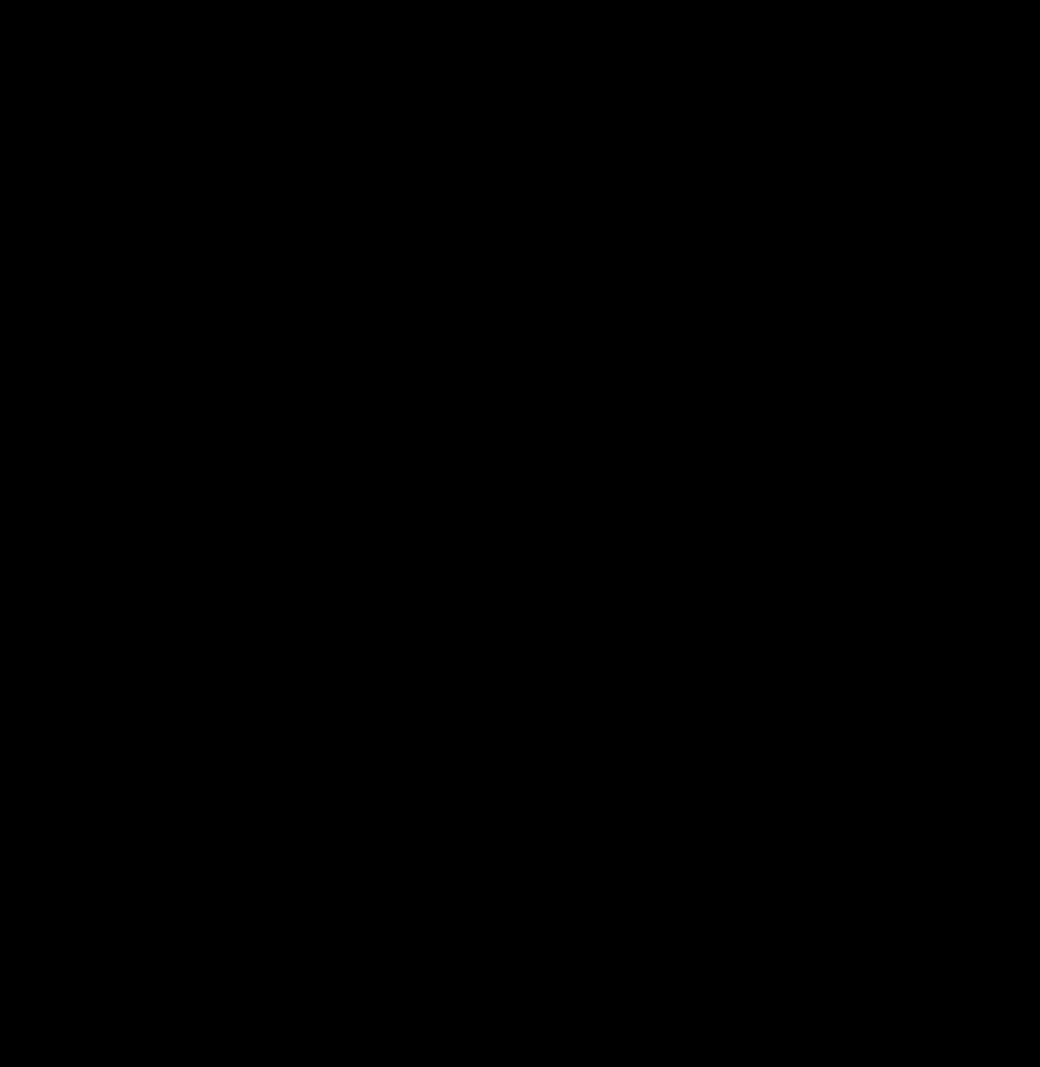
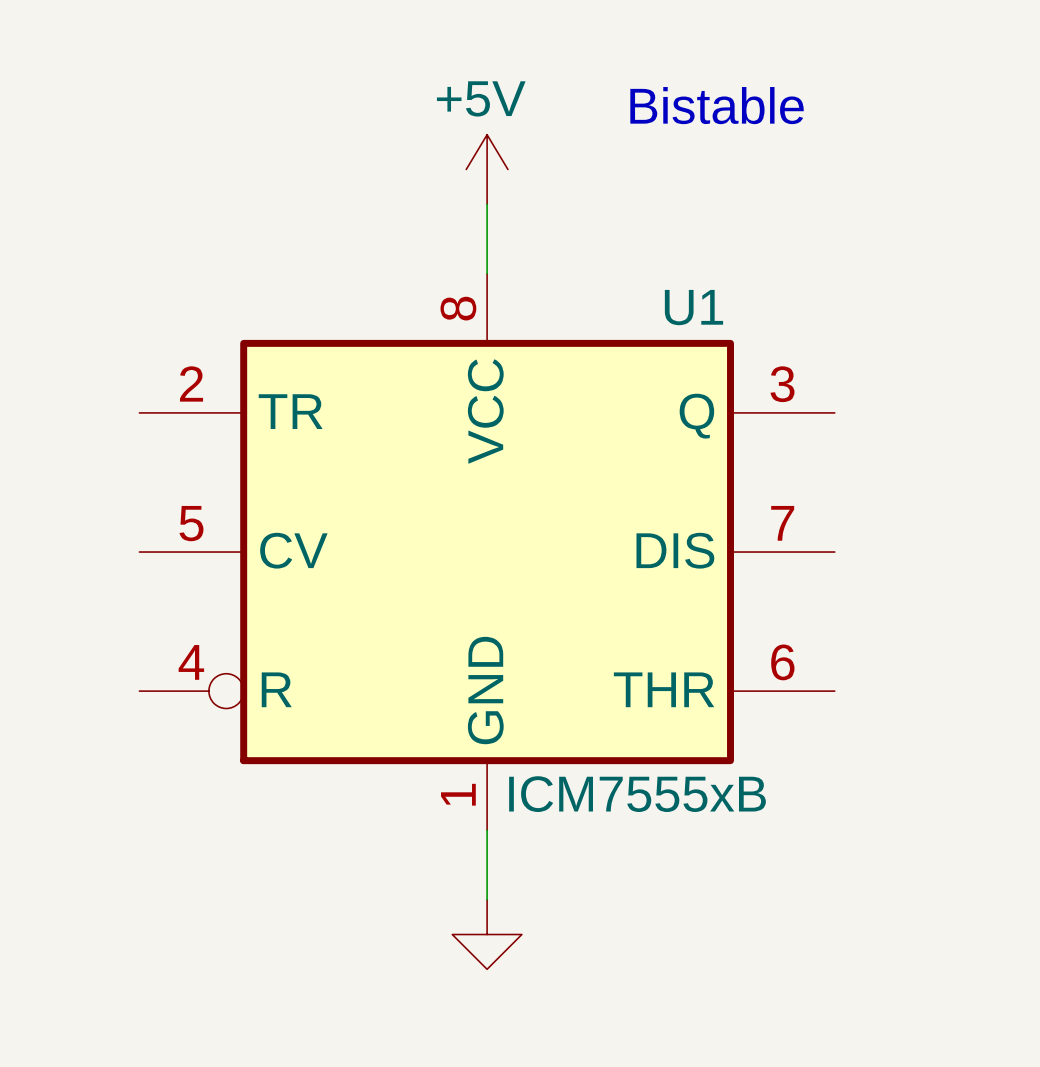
text: none -> Bistable (717, 105)
power symbol: none -> +5V (487, 169)
wire: none -> (487, 204) (487, 273)
U1: none -> ICM7555xB (487, 552)
wire: none -> (487, 830) (487, 899)
power symbol: none -> (487, 934)

